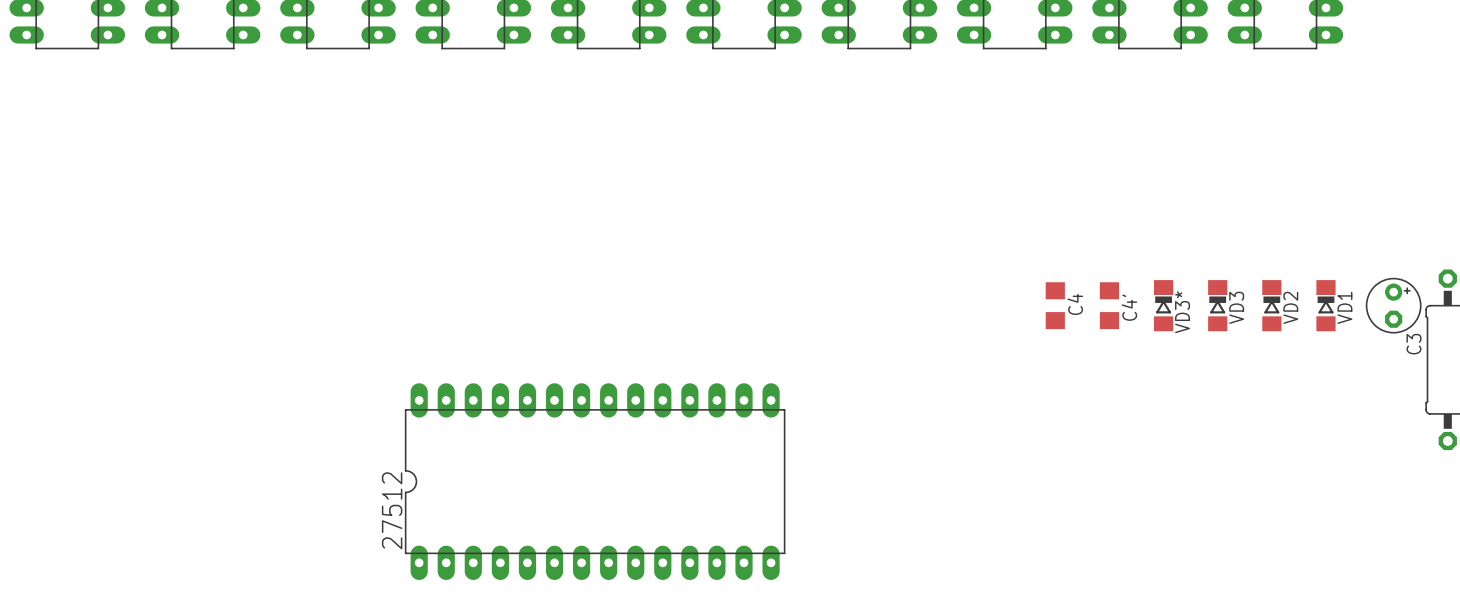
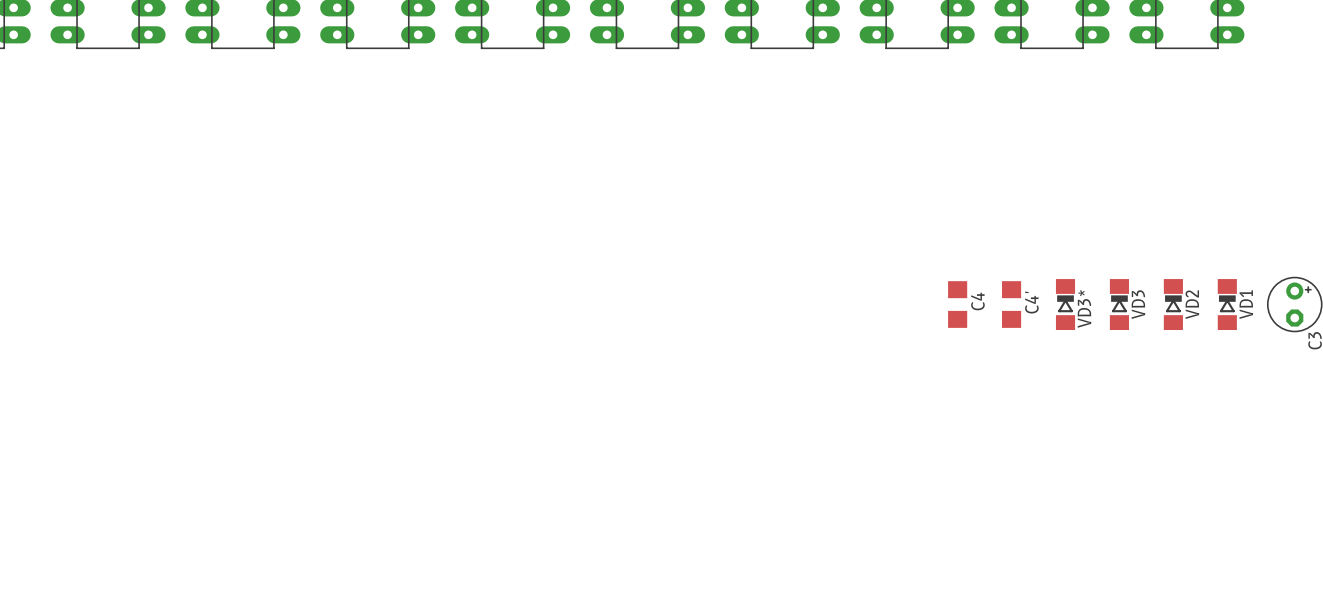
27512: (595, 481) -> none

